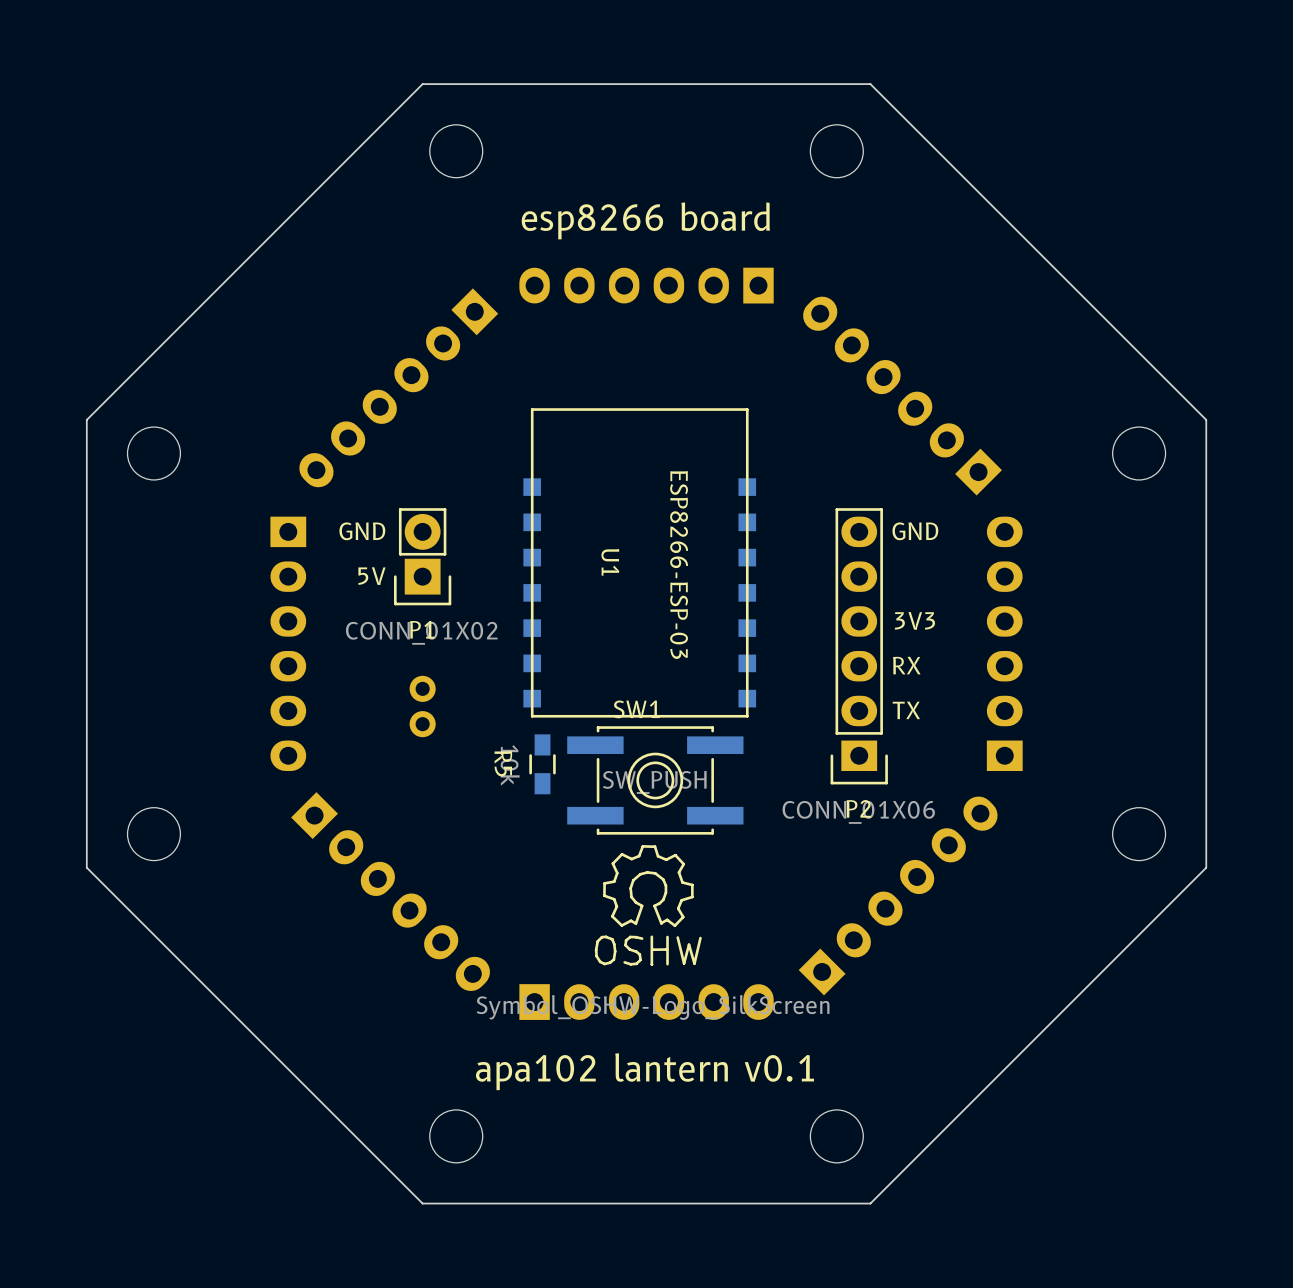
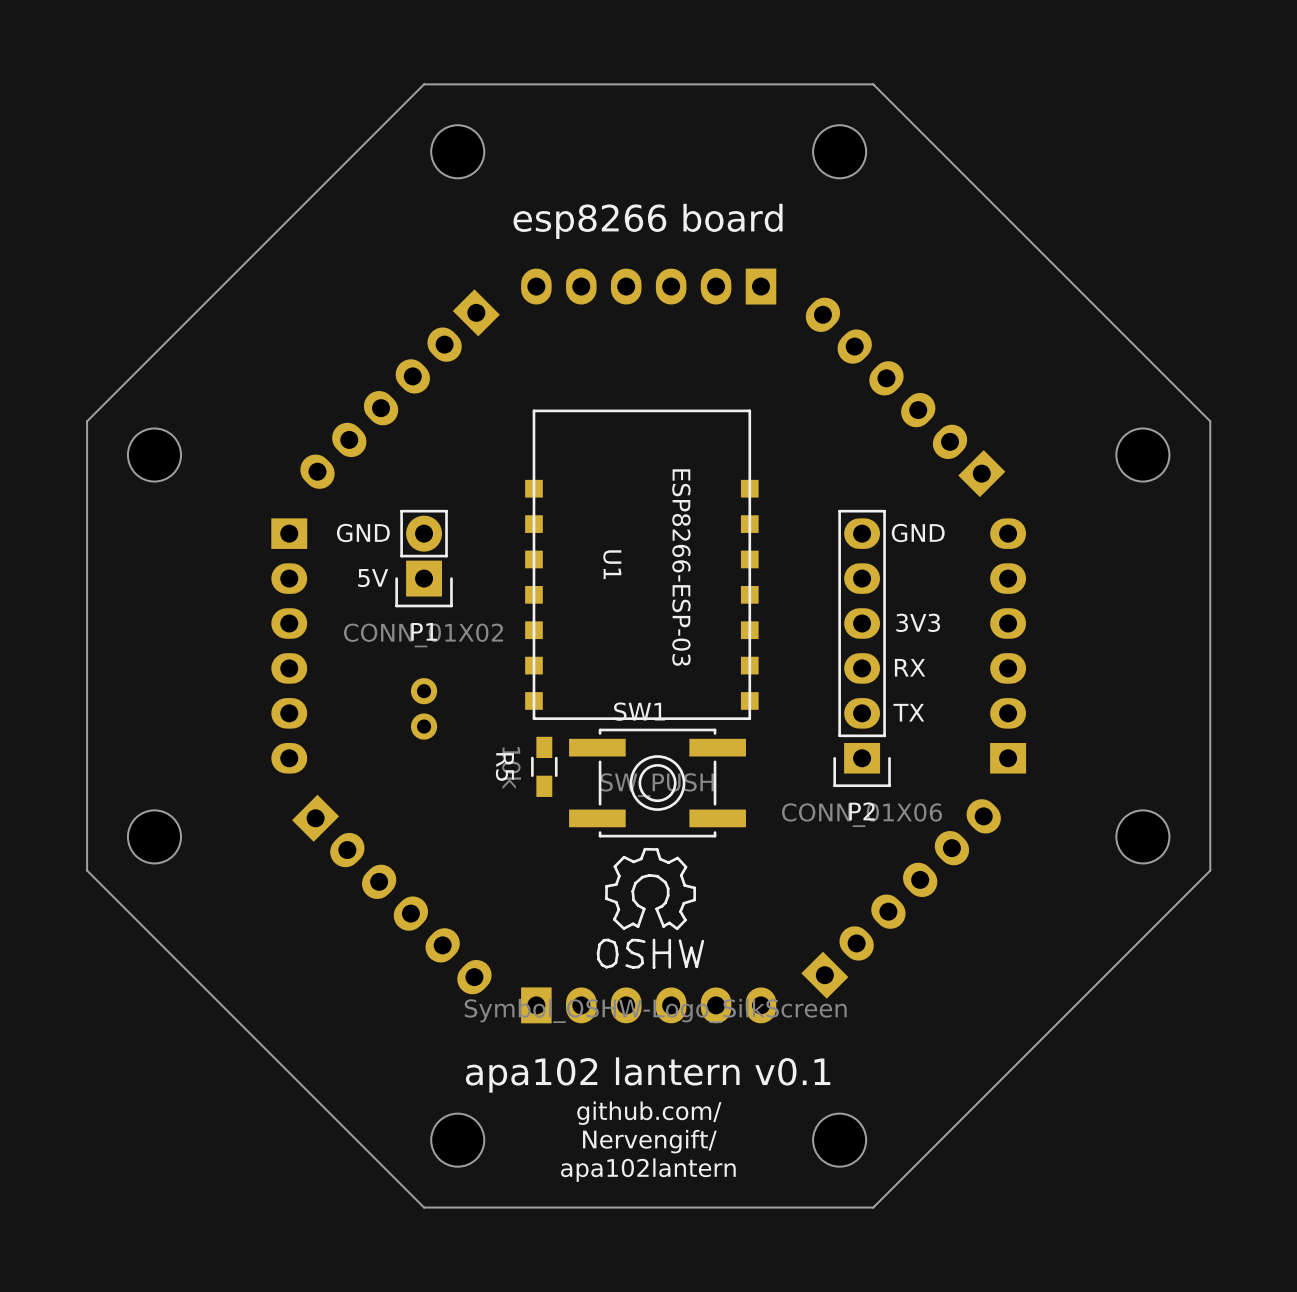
text: none -> github.com/ (649, 1113)
text: none -> Nervengift/ (649, 1141)
text: none -> apa102lantern (648, 1170)

